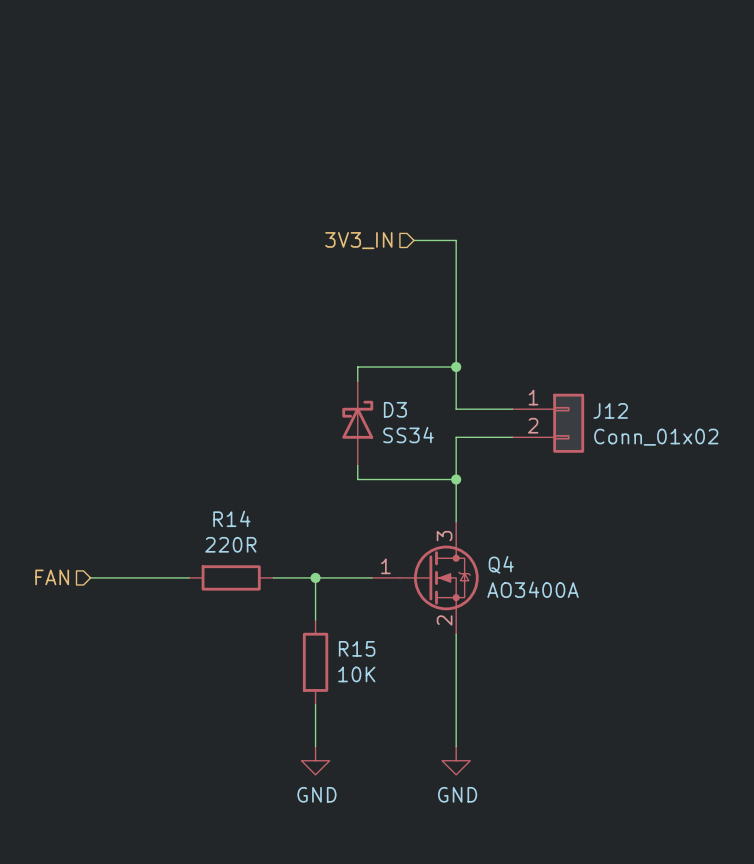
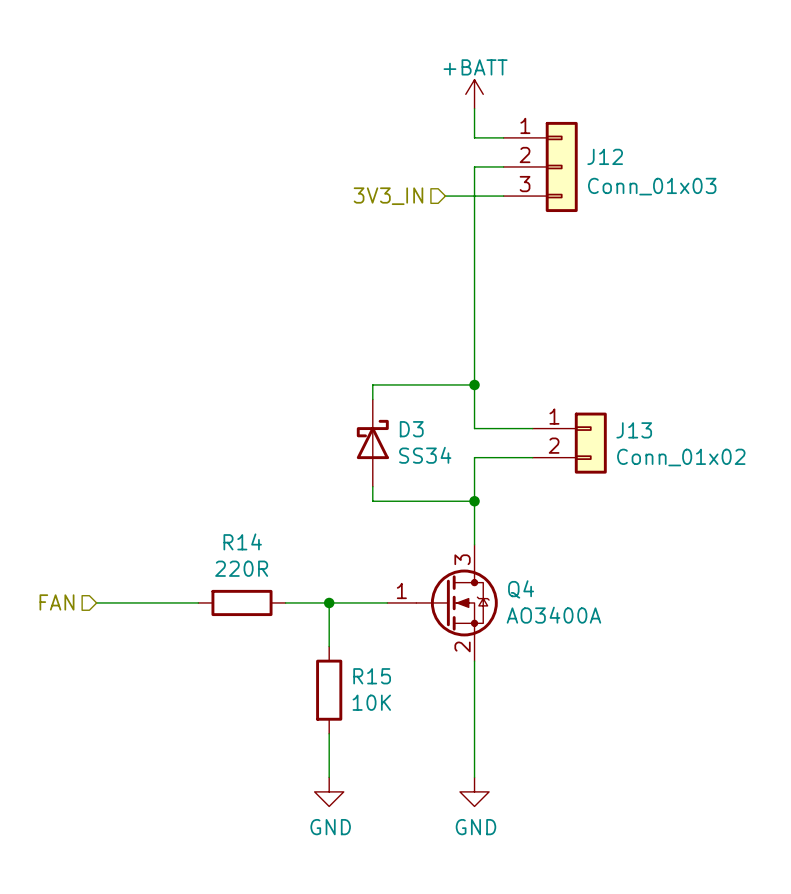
power symbol: none -> +BATT (474, 94)
wire: none -> (474, 108) (474, 137) (503, 137)
J12: none -> Conn_01x03 (540, 166)
wire: none -> (445, 196) (503, 196)
hierarchical label position: 3V3_IN (358, 240) -> 3V3_IN (388, 196)
wire: (413, 240) (456, 240) -> (503, 166) (474, 166) (474, 254)
J12 name: J12 (610, 410) -> J13 (634, 430)

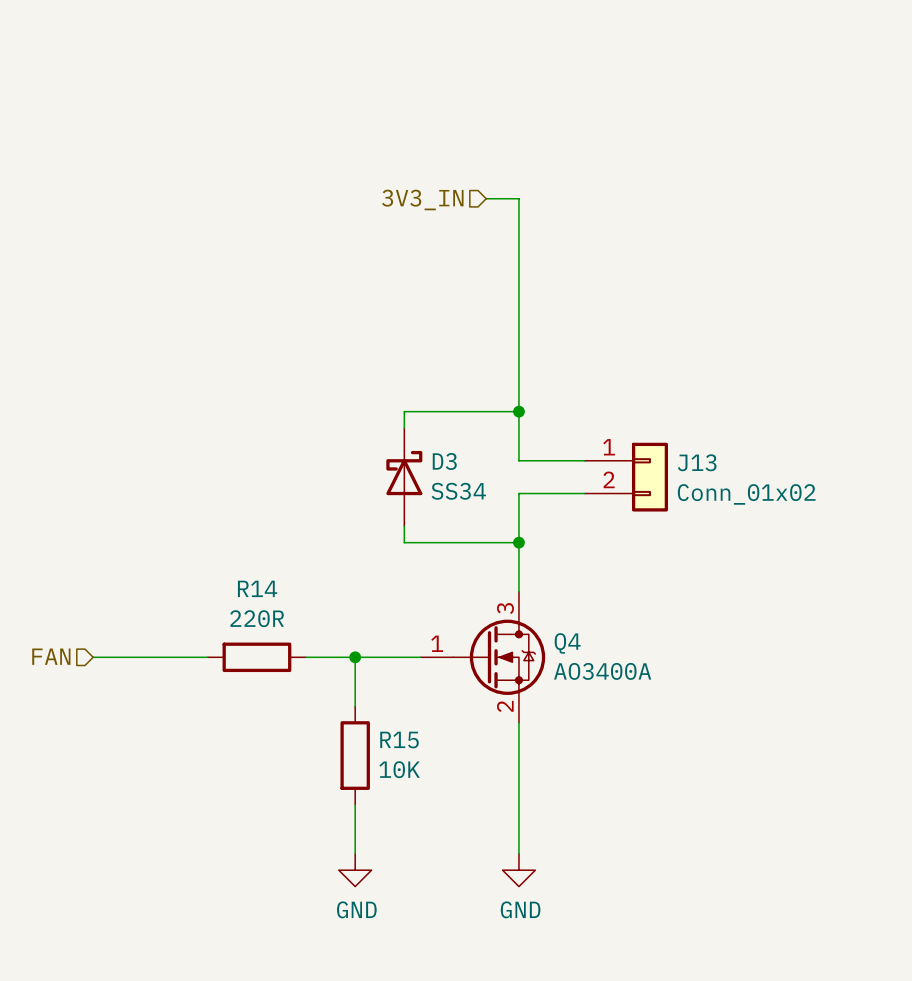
power symbol: +BATT (474, 94) -> none
wire: (474, 108) (474, 137) (503, 137) -> none
wire: (503, 166) (474, 166) (474, 196) (503, 196) -> none
J12: Conn_01x03 (540, 166) -> none

